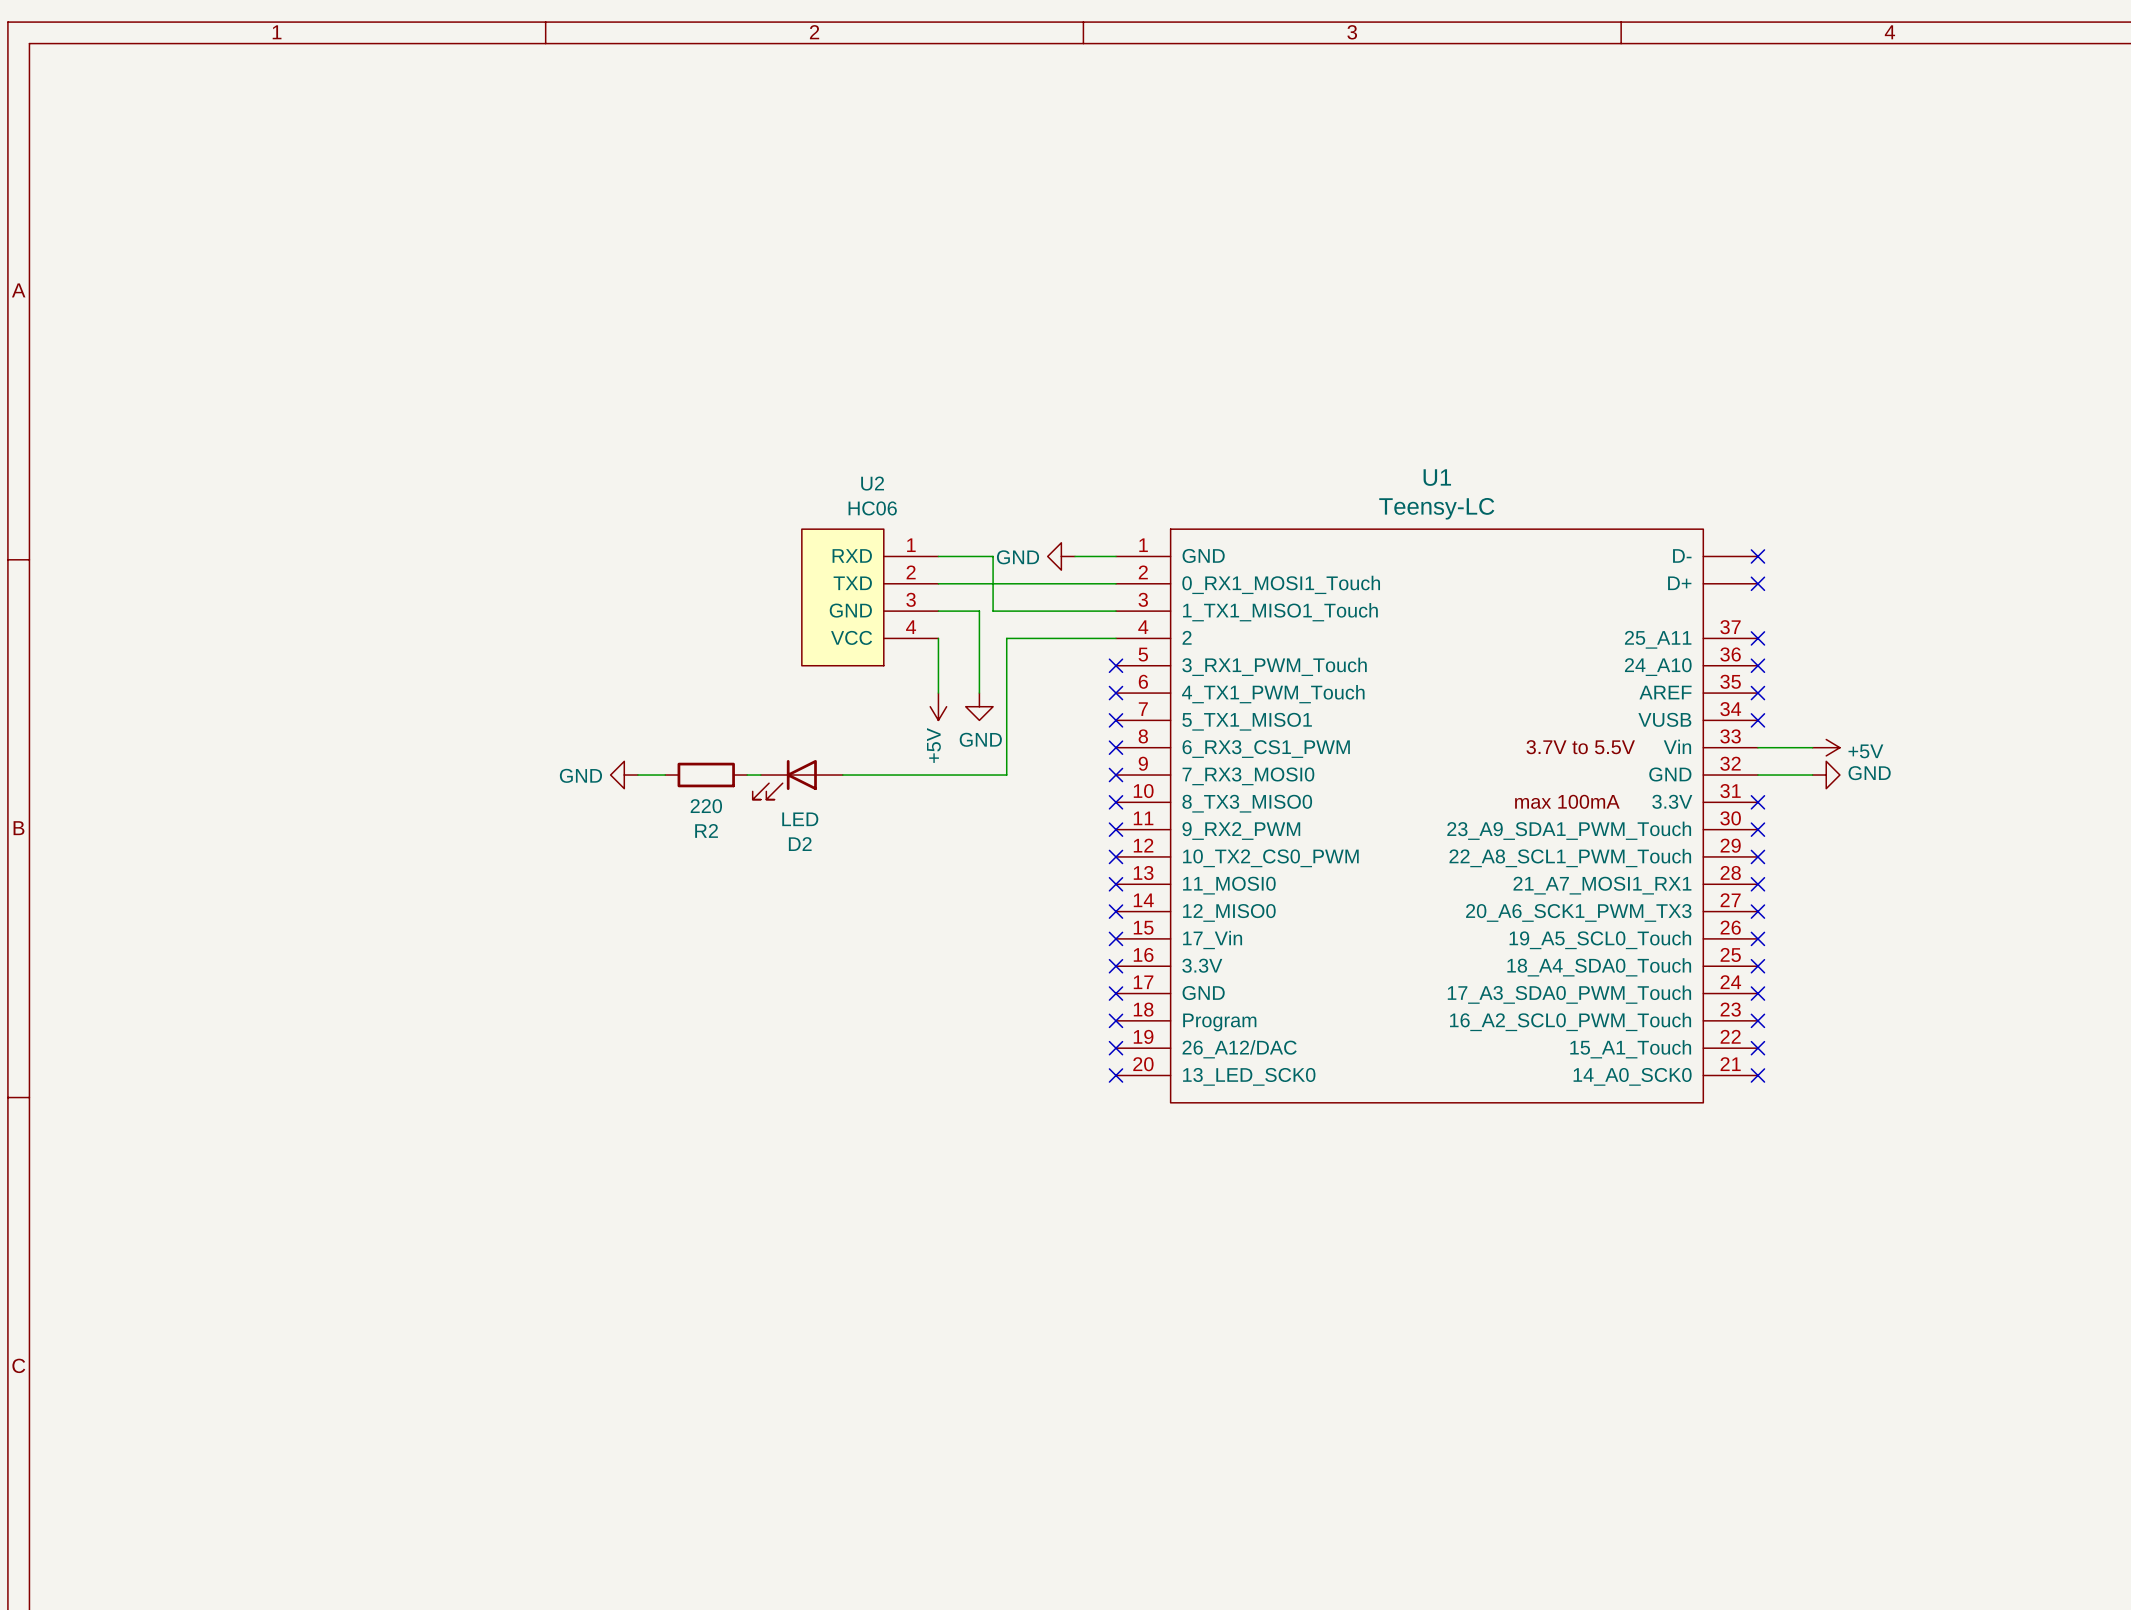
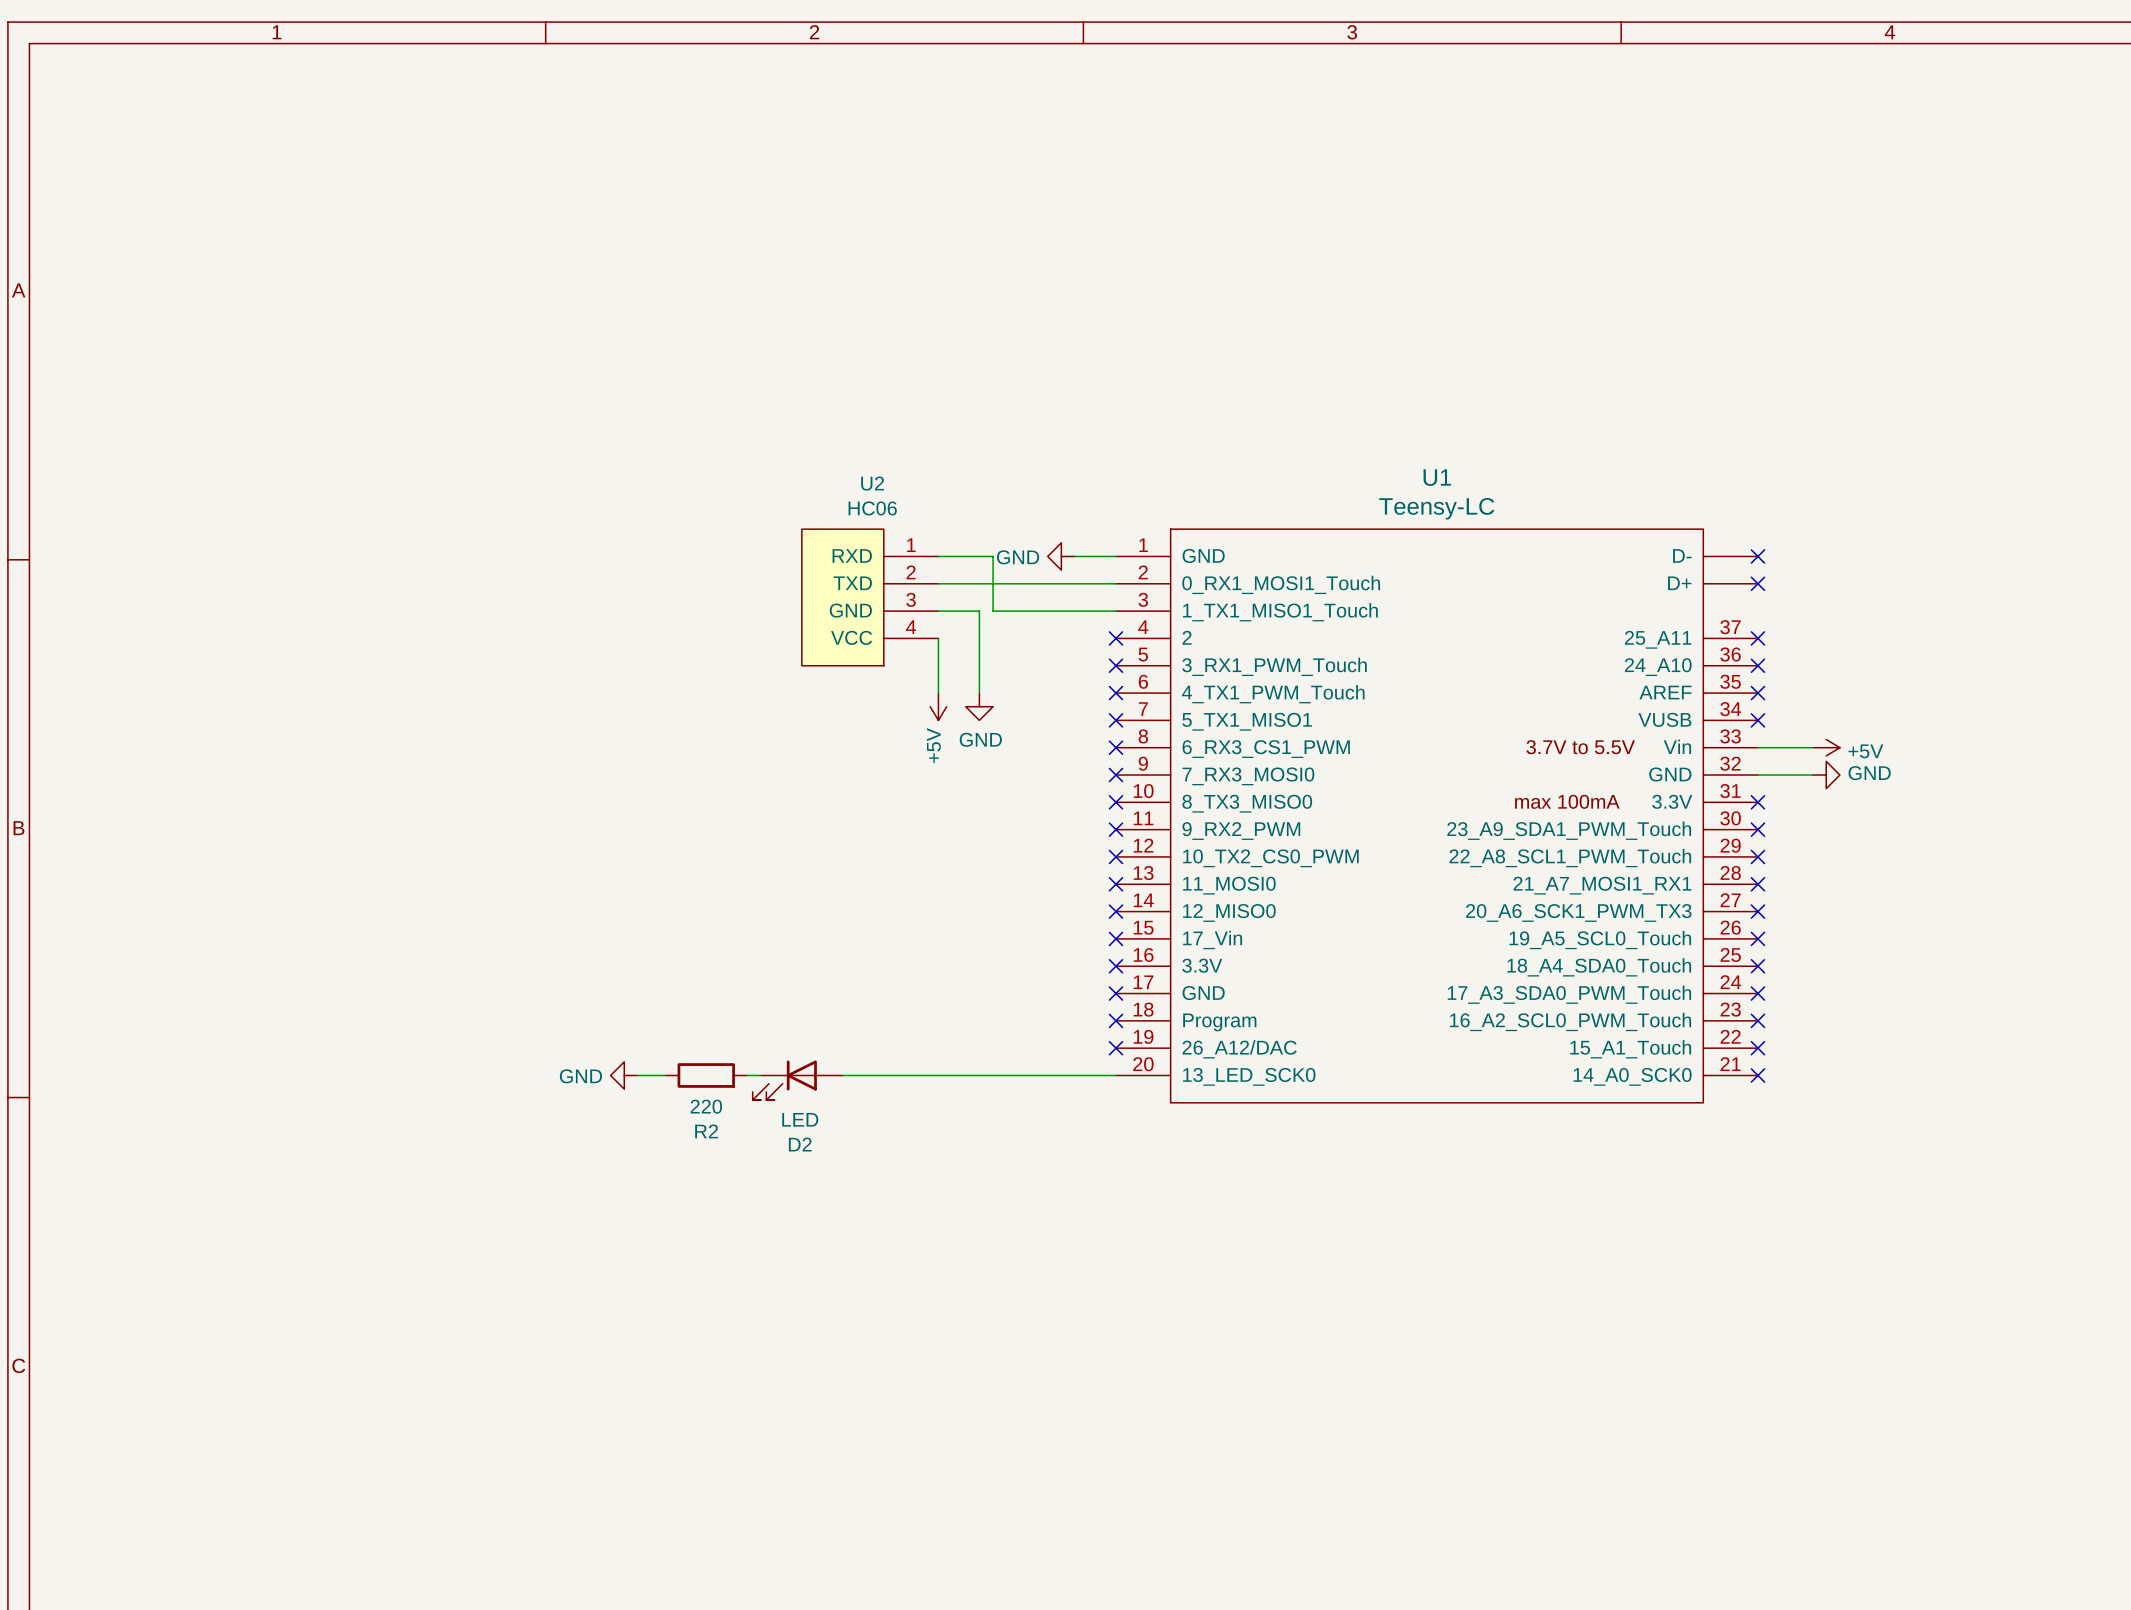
wire: (1115, 638) (1006, 638) (1006, 775) (842, 775) -> none
no-connect mark: none -> (1115, 638)
power symbol: GND (624, 775) -> none
wire: (637, 775) (665, 775) -> none
R2 position: (706, 775) -> (706, 1075)
wire: (747, 775) (760, 775) -> none
D2 position: (797, 779) -> (797, 1080)
power symbol: none -> GND (624, 1075)
wire: none -> (637, 1075) (665, 1075)
wire: none -> (747, 1075) (760, 1075)
wire: none -> (842, 1075) (1115, 1075)
no-connect mark: (1115, 1075) -> none

